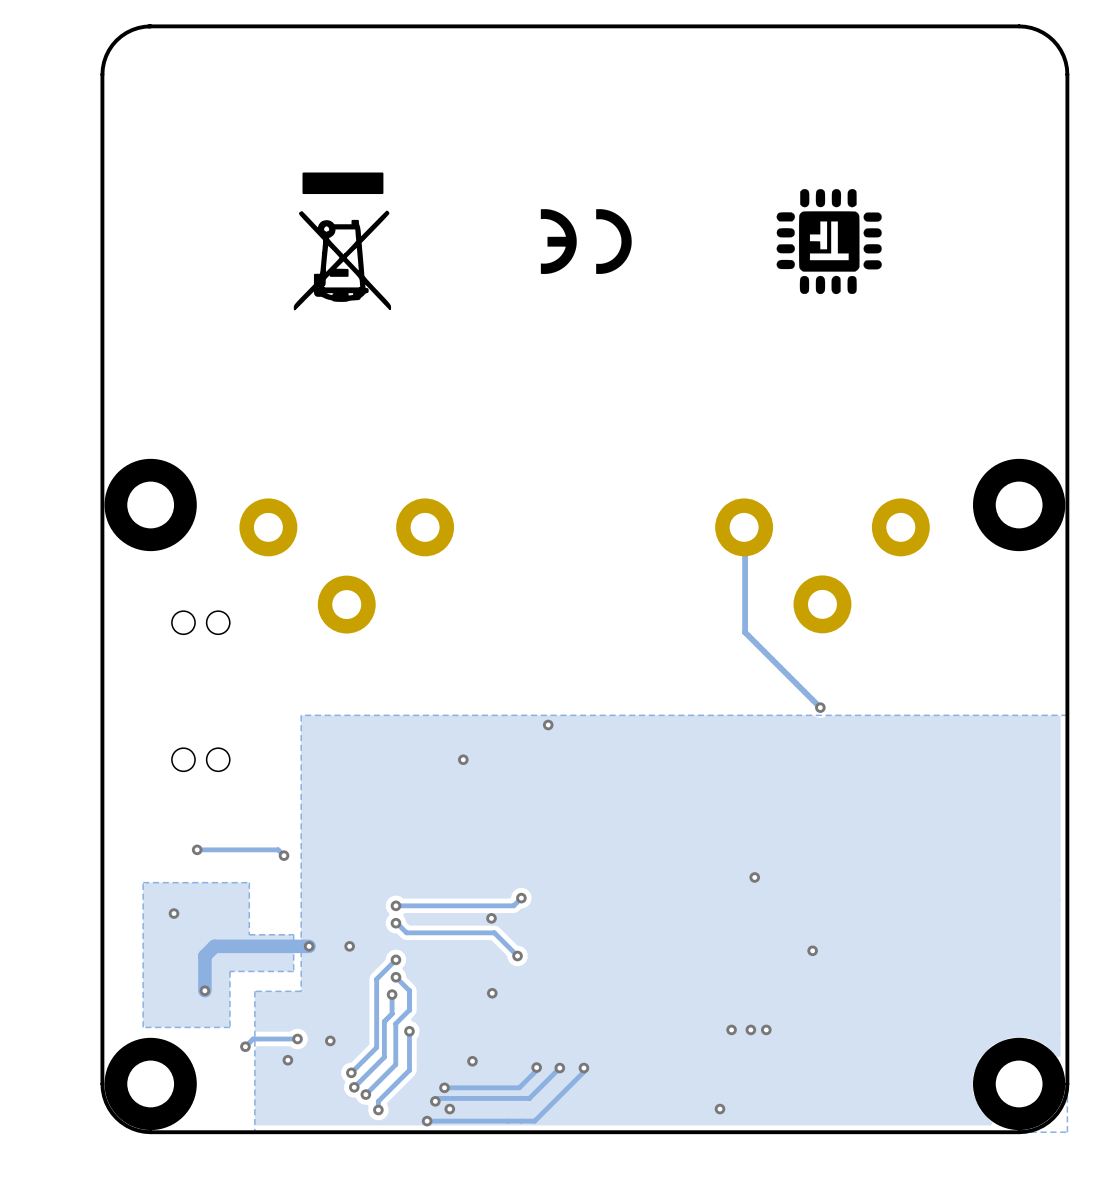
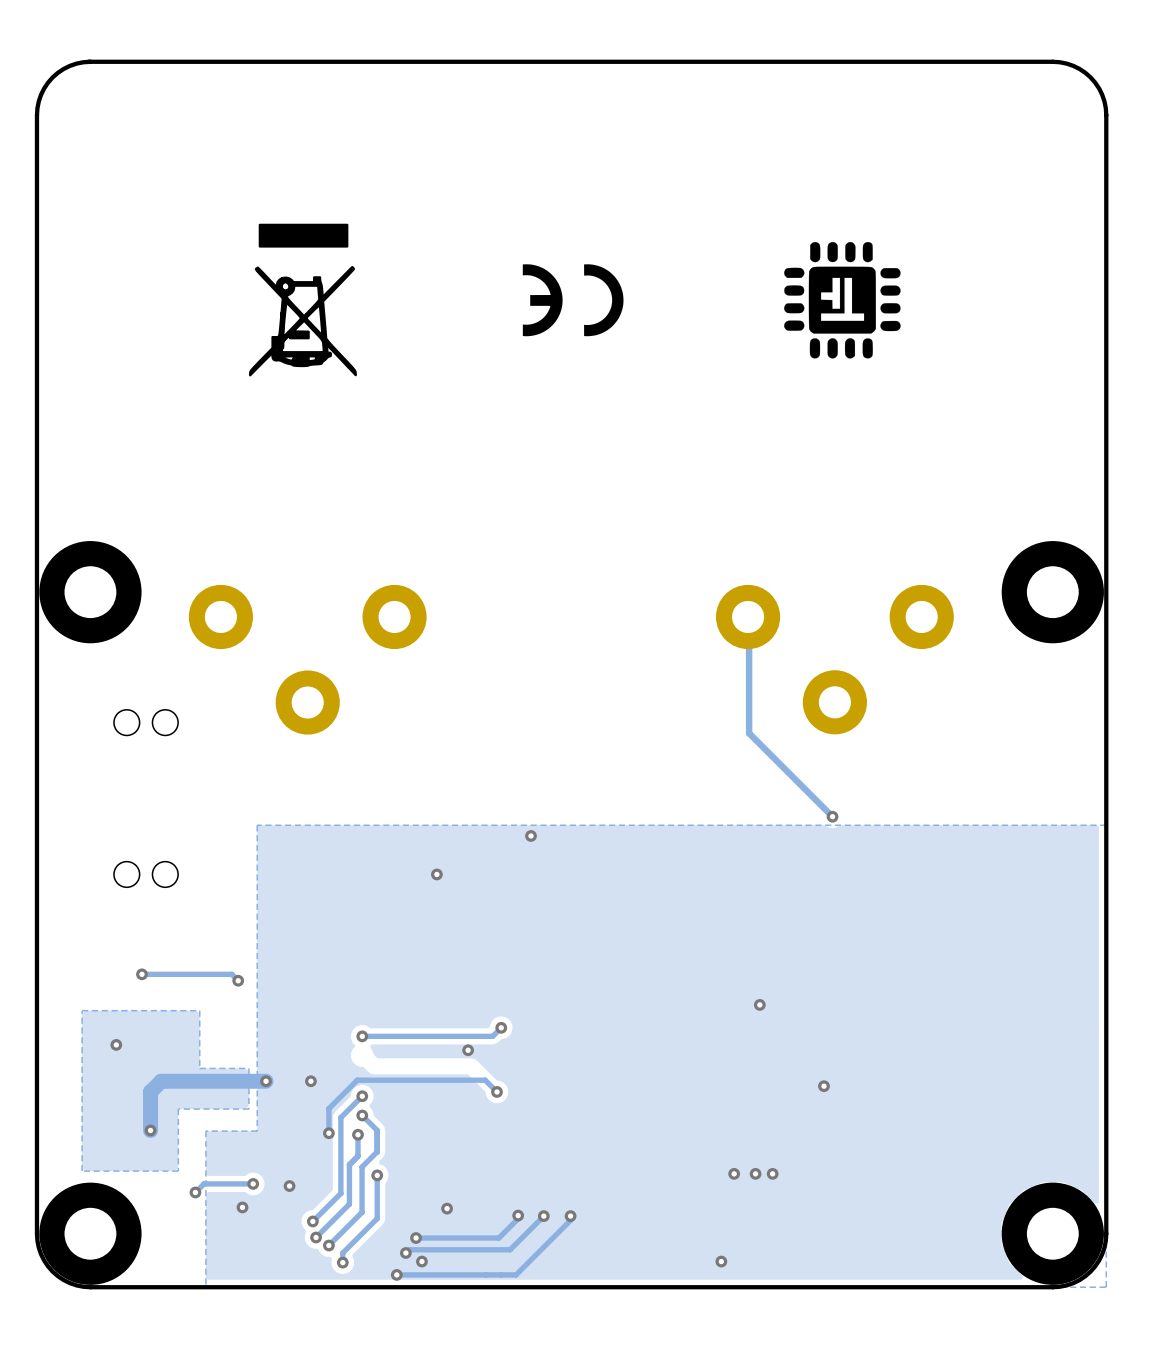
track: (395, 923) (406, 932) (494, 932) (506, 945) -> (328, 1133) (328, 1108) (357, 1080) (485, 1080)
via: (395, 923) -> none
via: none -> (328, 1133)
via: (492, 993) -> none

